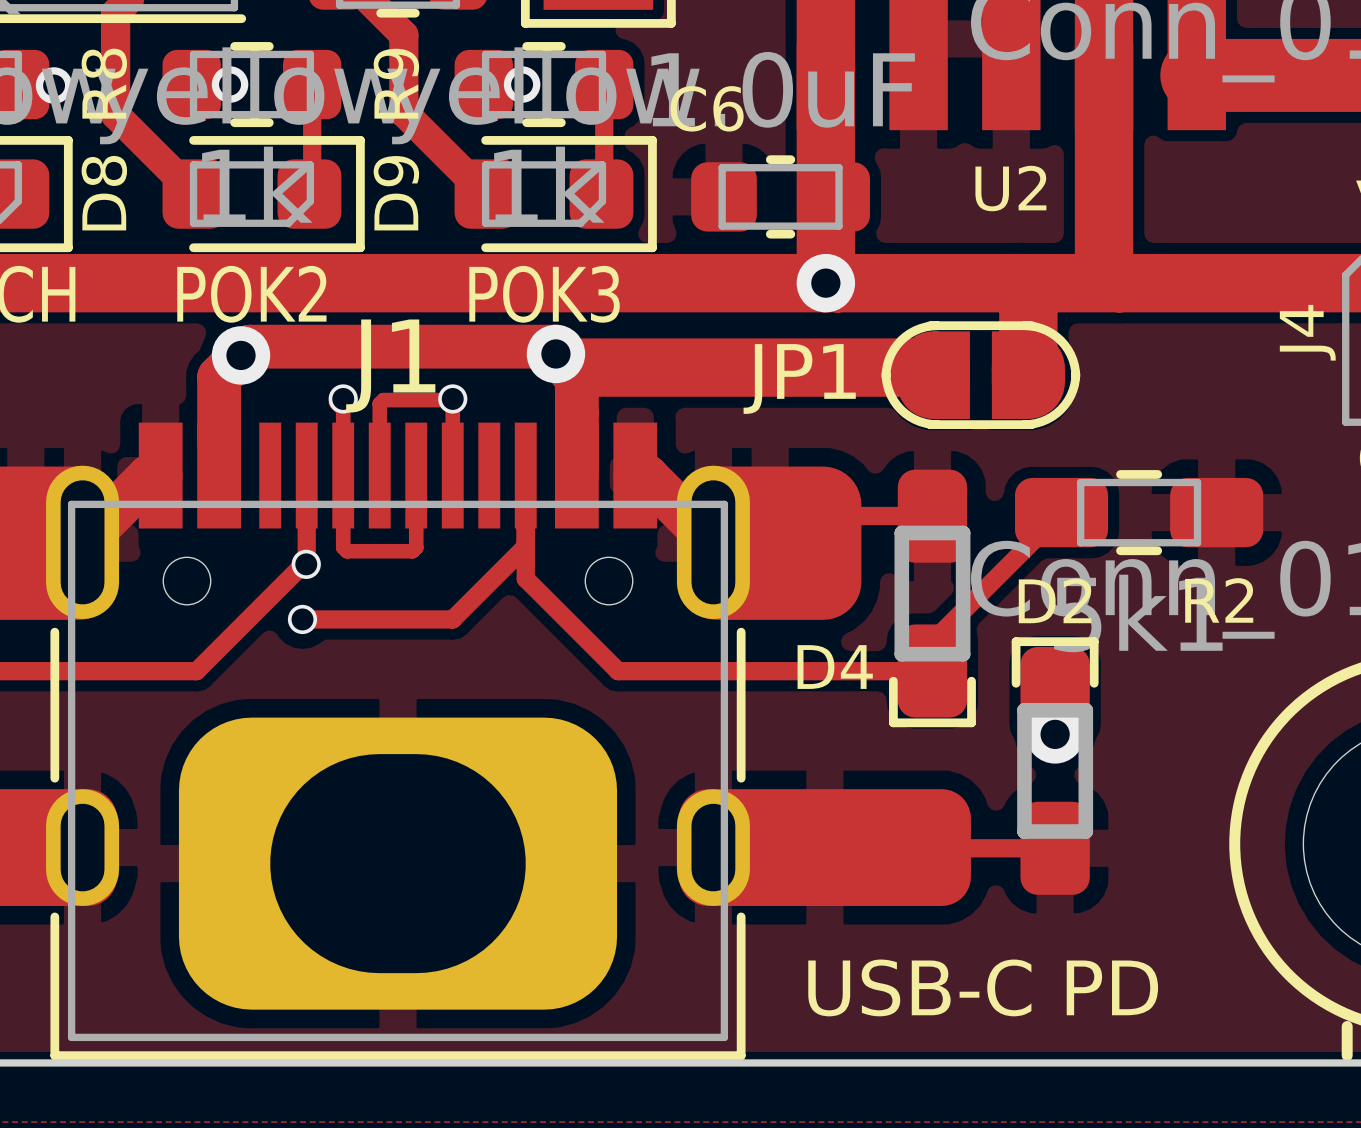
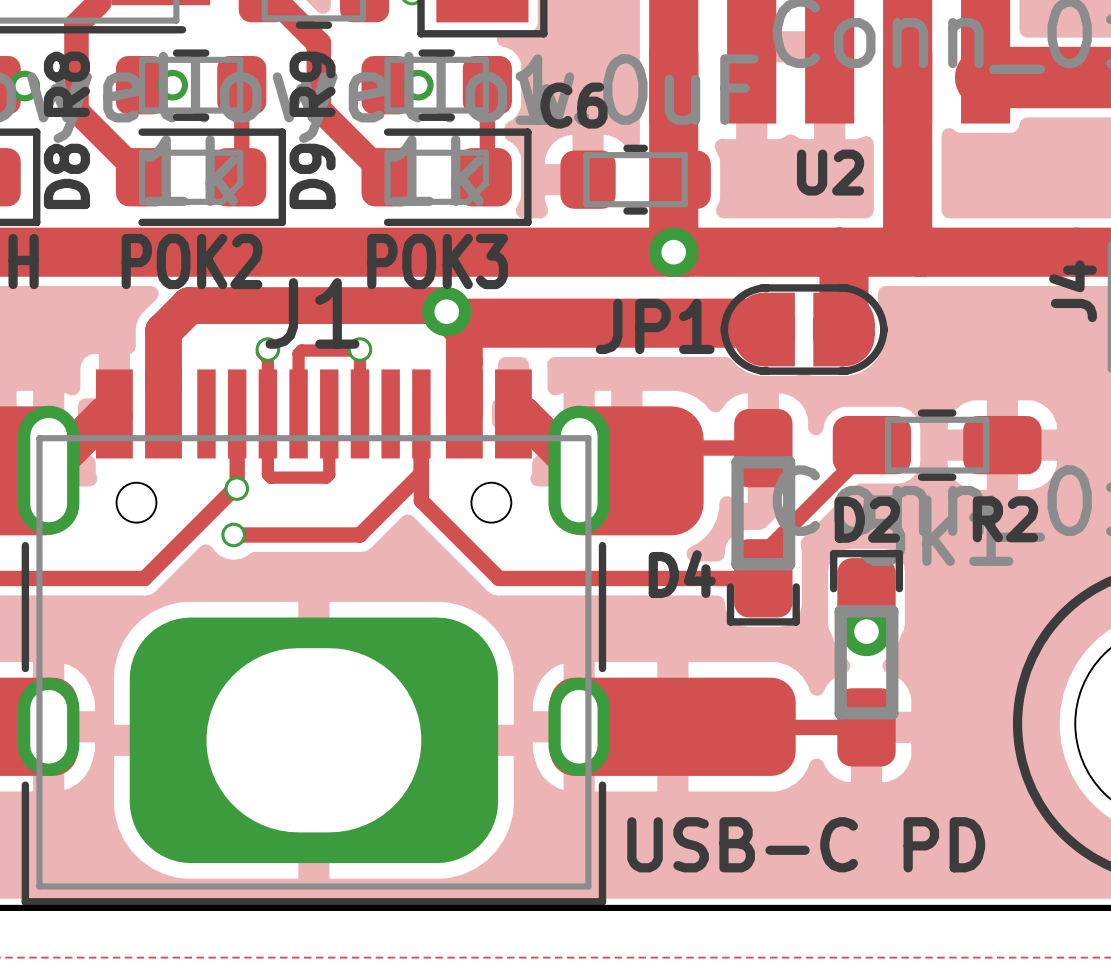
via: (241, 355) -> none

